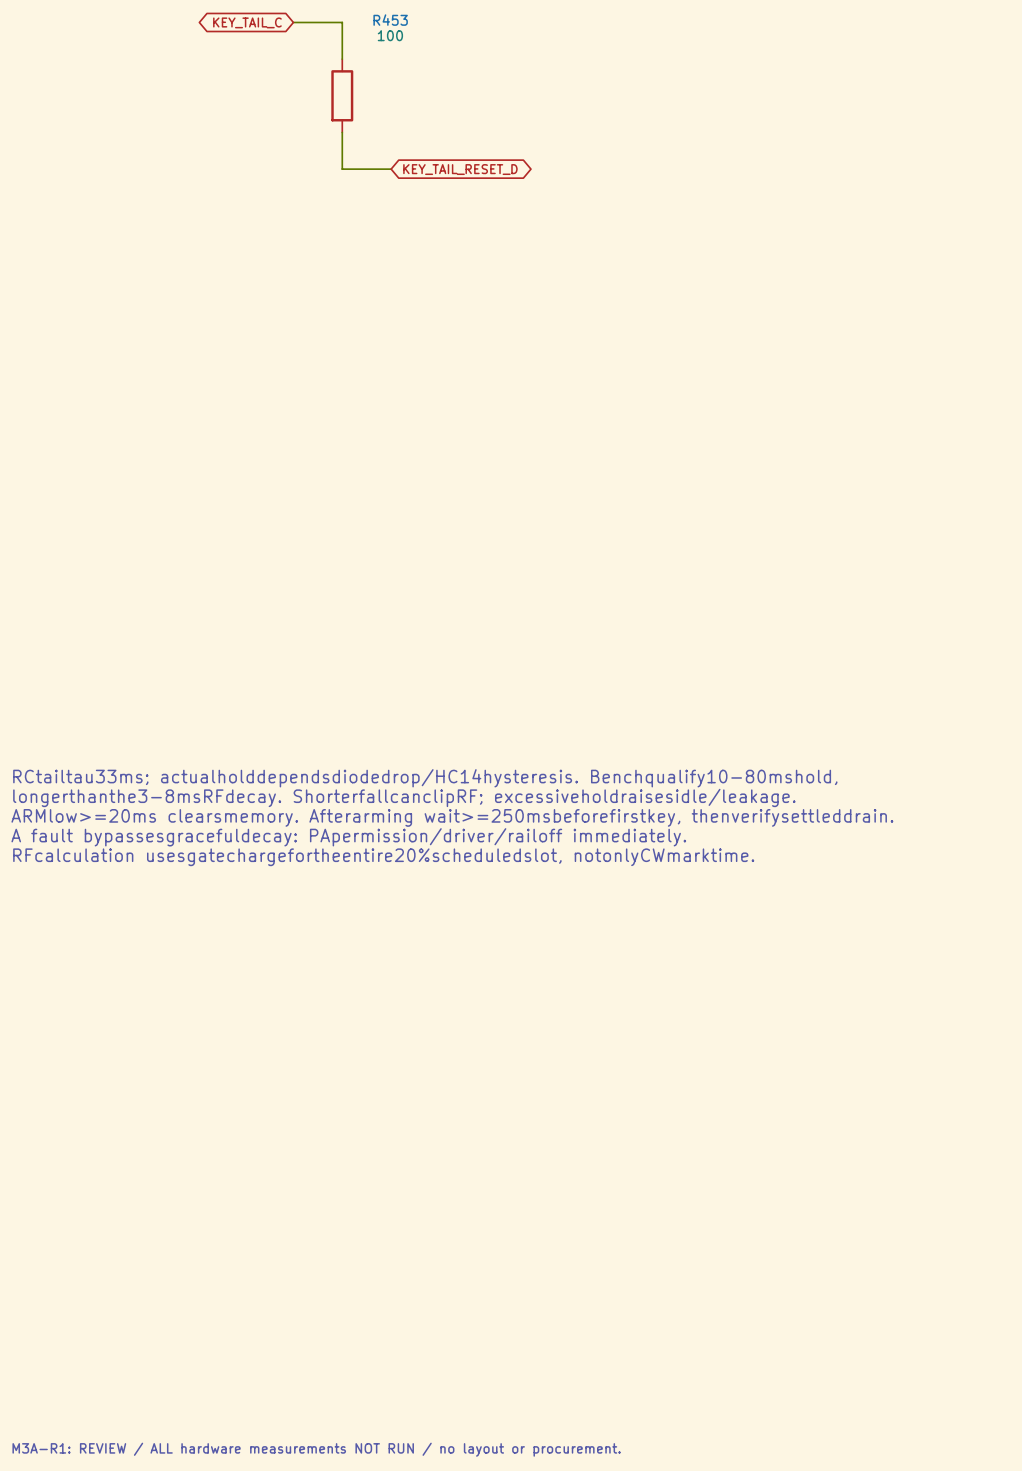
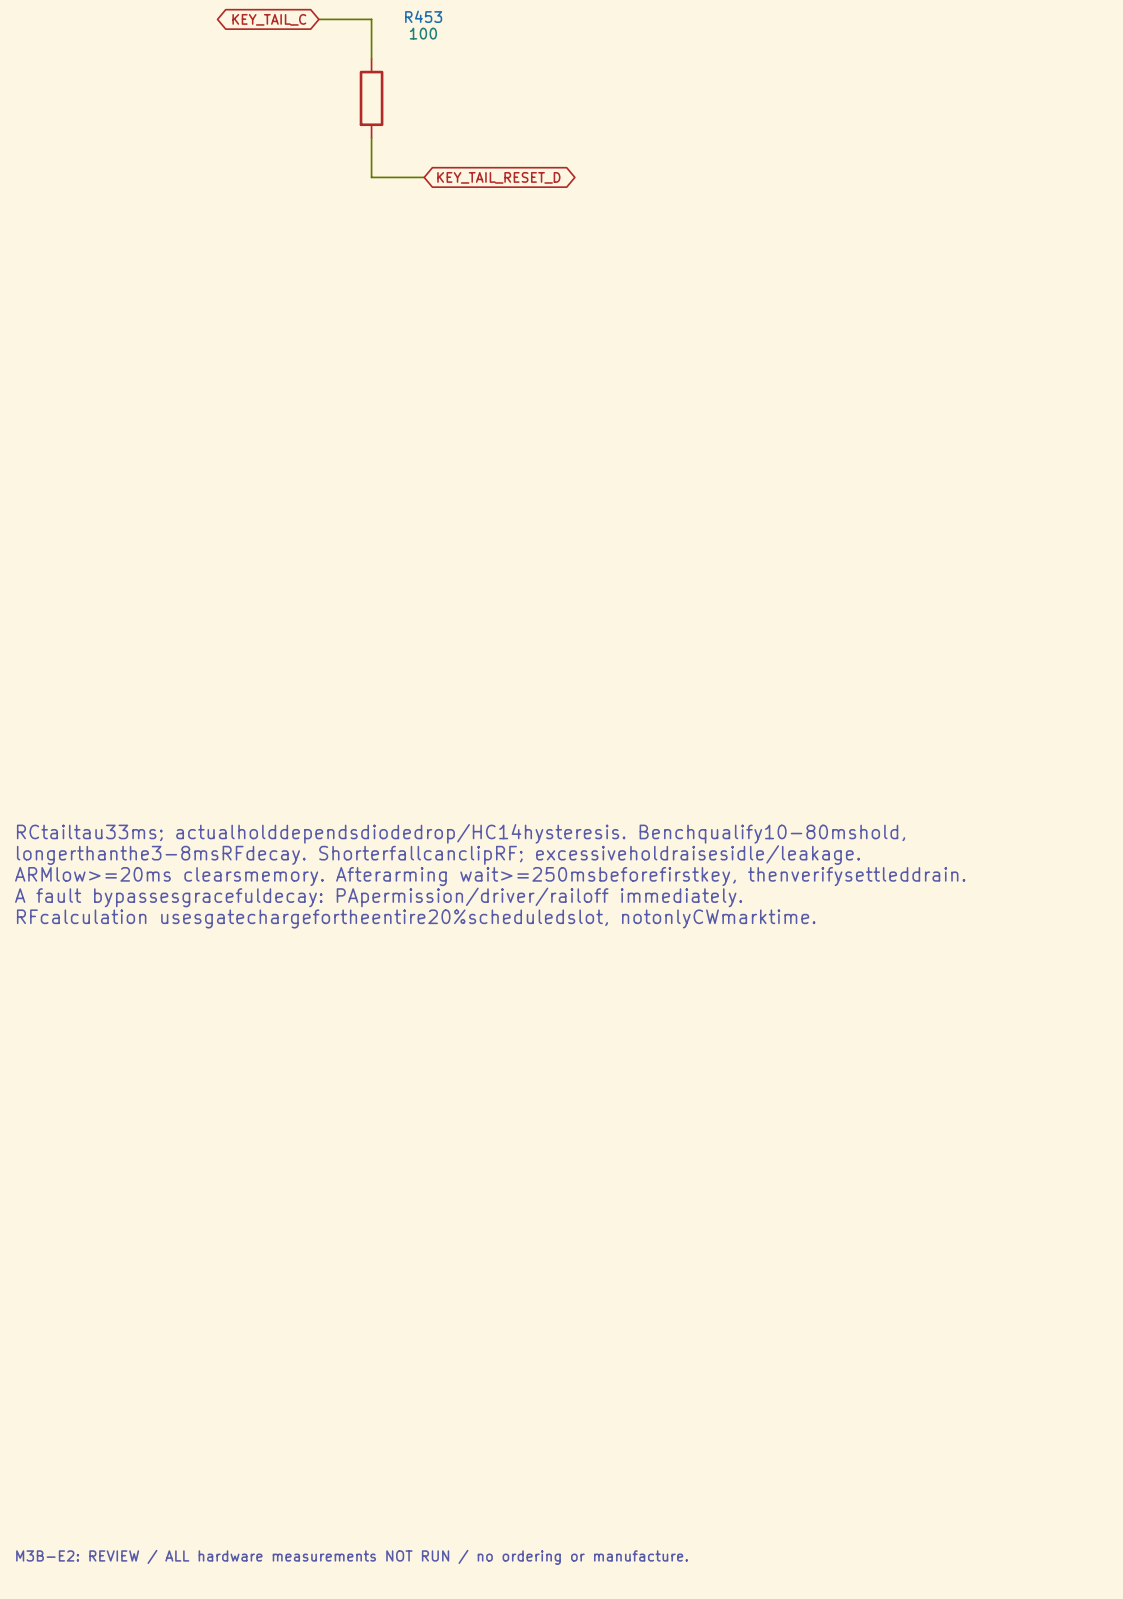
text: M3A-R1: REVIEW / ALL hardware measurements NOT RUN / no layout or procurement. (316, 1449) -> M3B-E2: REVIEW / ALL hardware measurements NOT RUN / no ordering or manufacture. (352, 1557)

